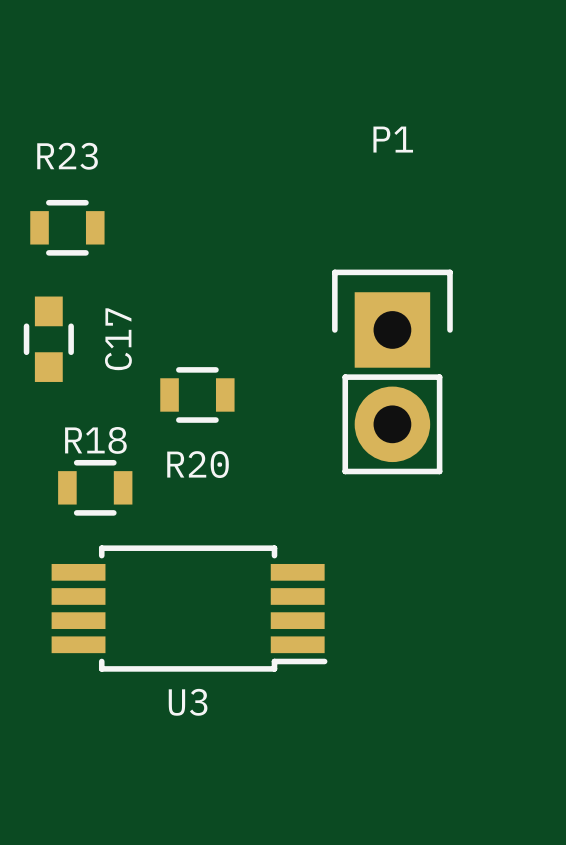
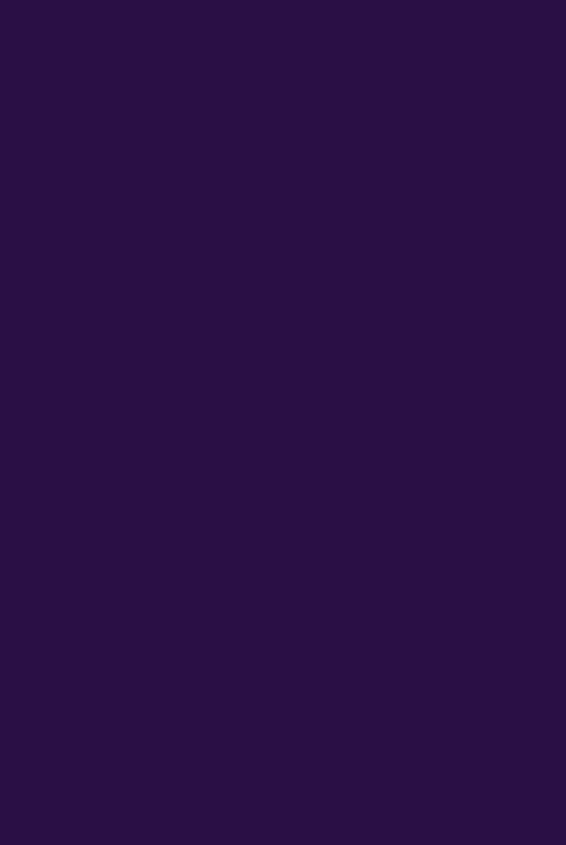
R23: (67, 227) -> none
C17: (48, 339) -> none
P1: (392, 371) -> none
R20: (197, 394) -> none
R18: (95, 487) -> none
U3: (189, 608) -> none

